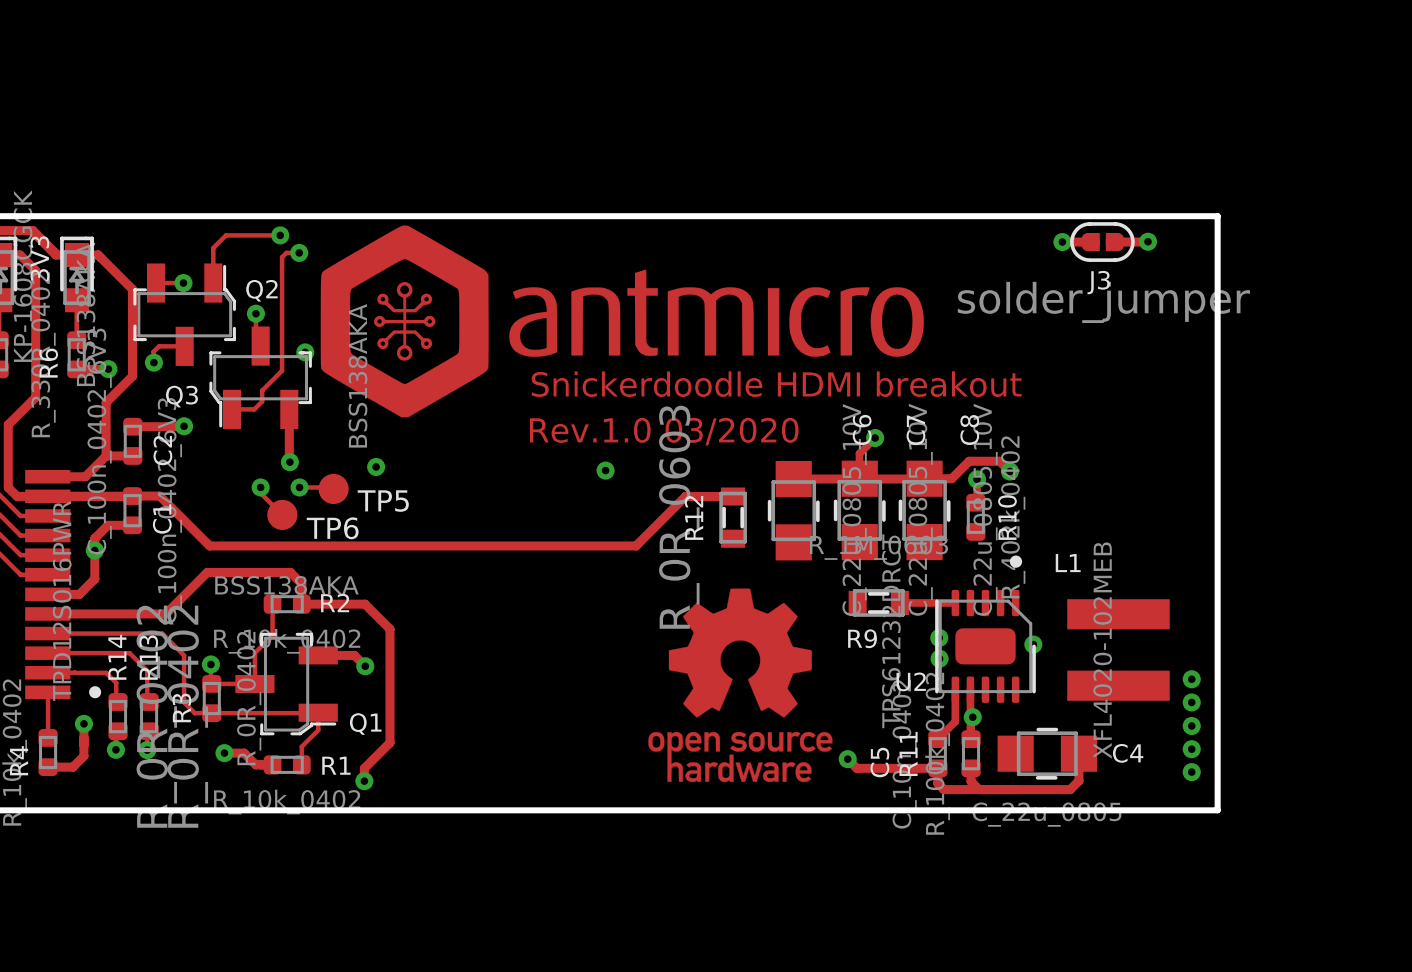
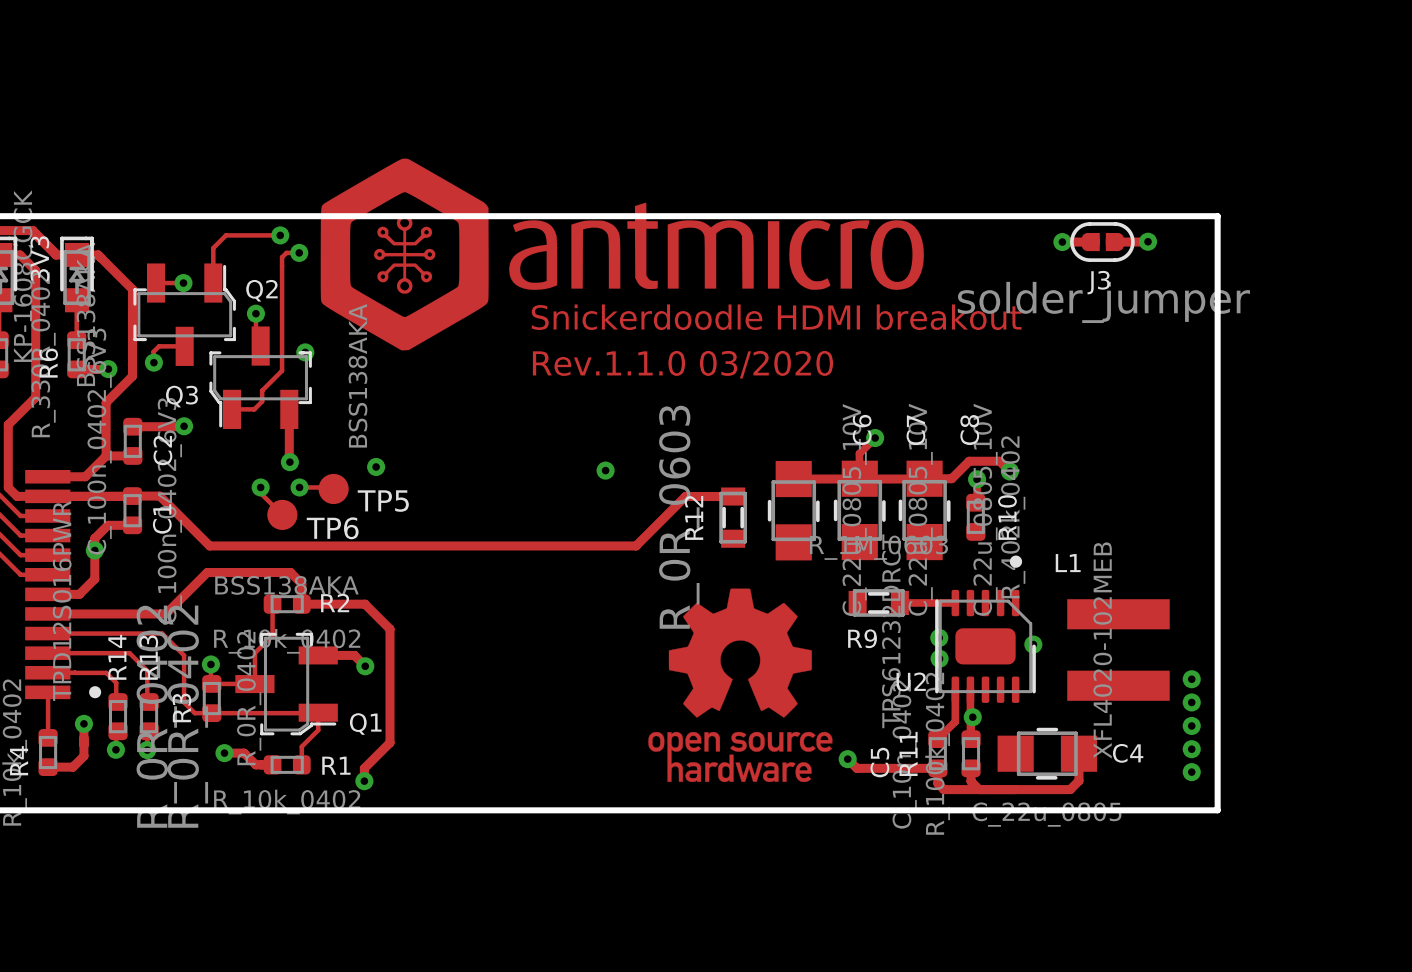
drawing position: (622, 321) -> (622, 254)
text: none -> Rev.1.1.0 03/2020 (682, 364)
text position: Snickerdoodle HDMI breakout (776, 384) -> Snickerdoodle HDMI breakout (776, 317)
text: Rev.1.0 03/2020 (664, 431) -> none

